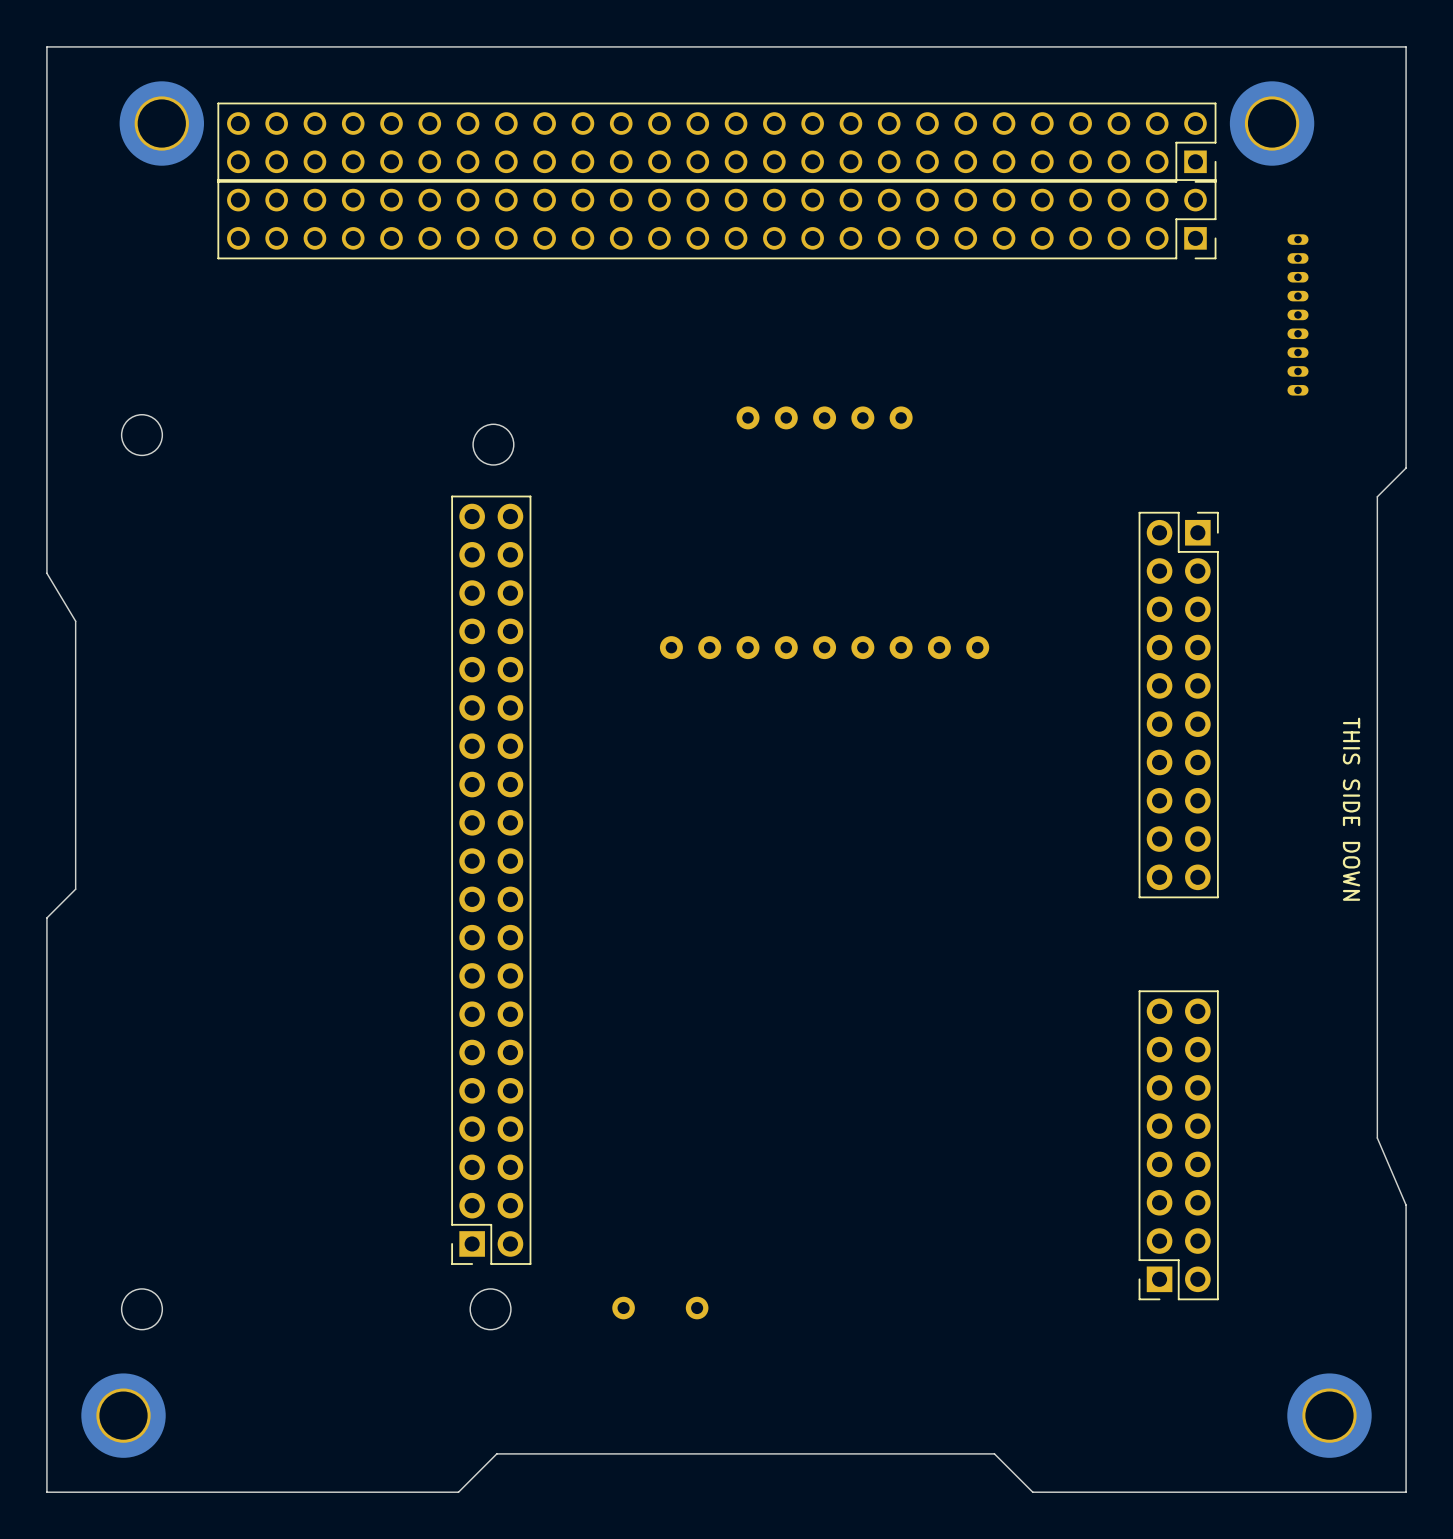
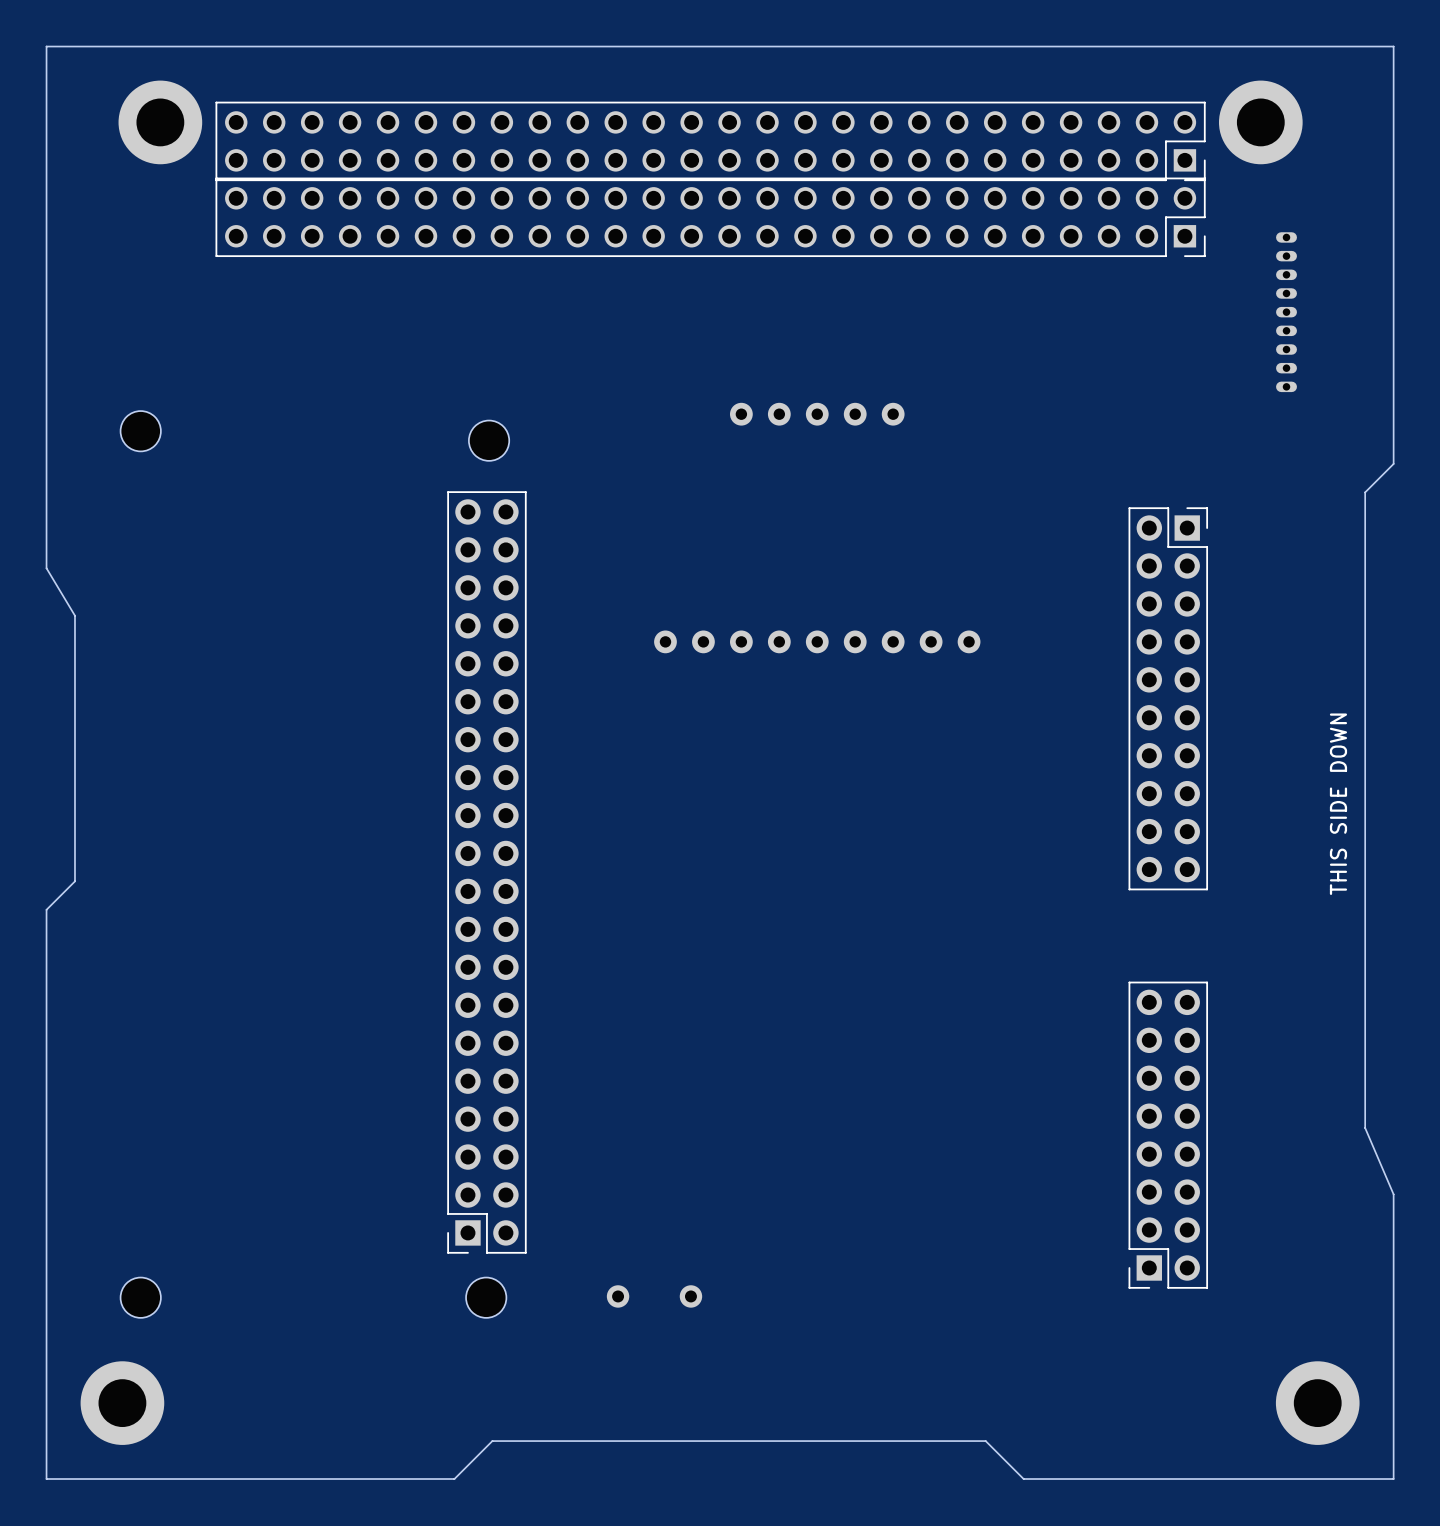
text rotation: 0° (1351, 809) -> 180° (1338, 804)

